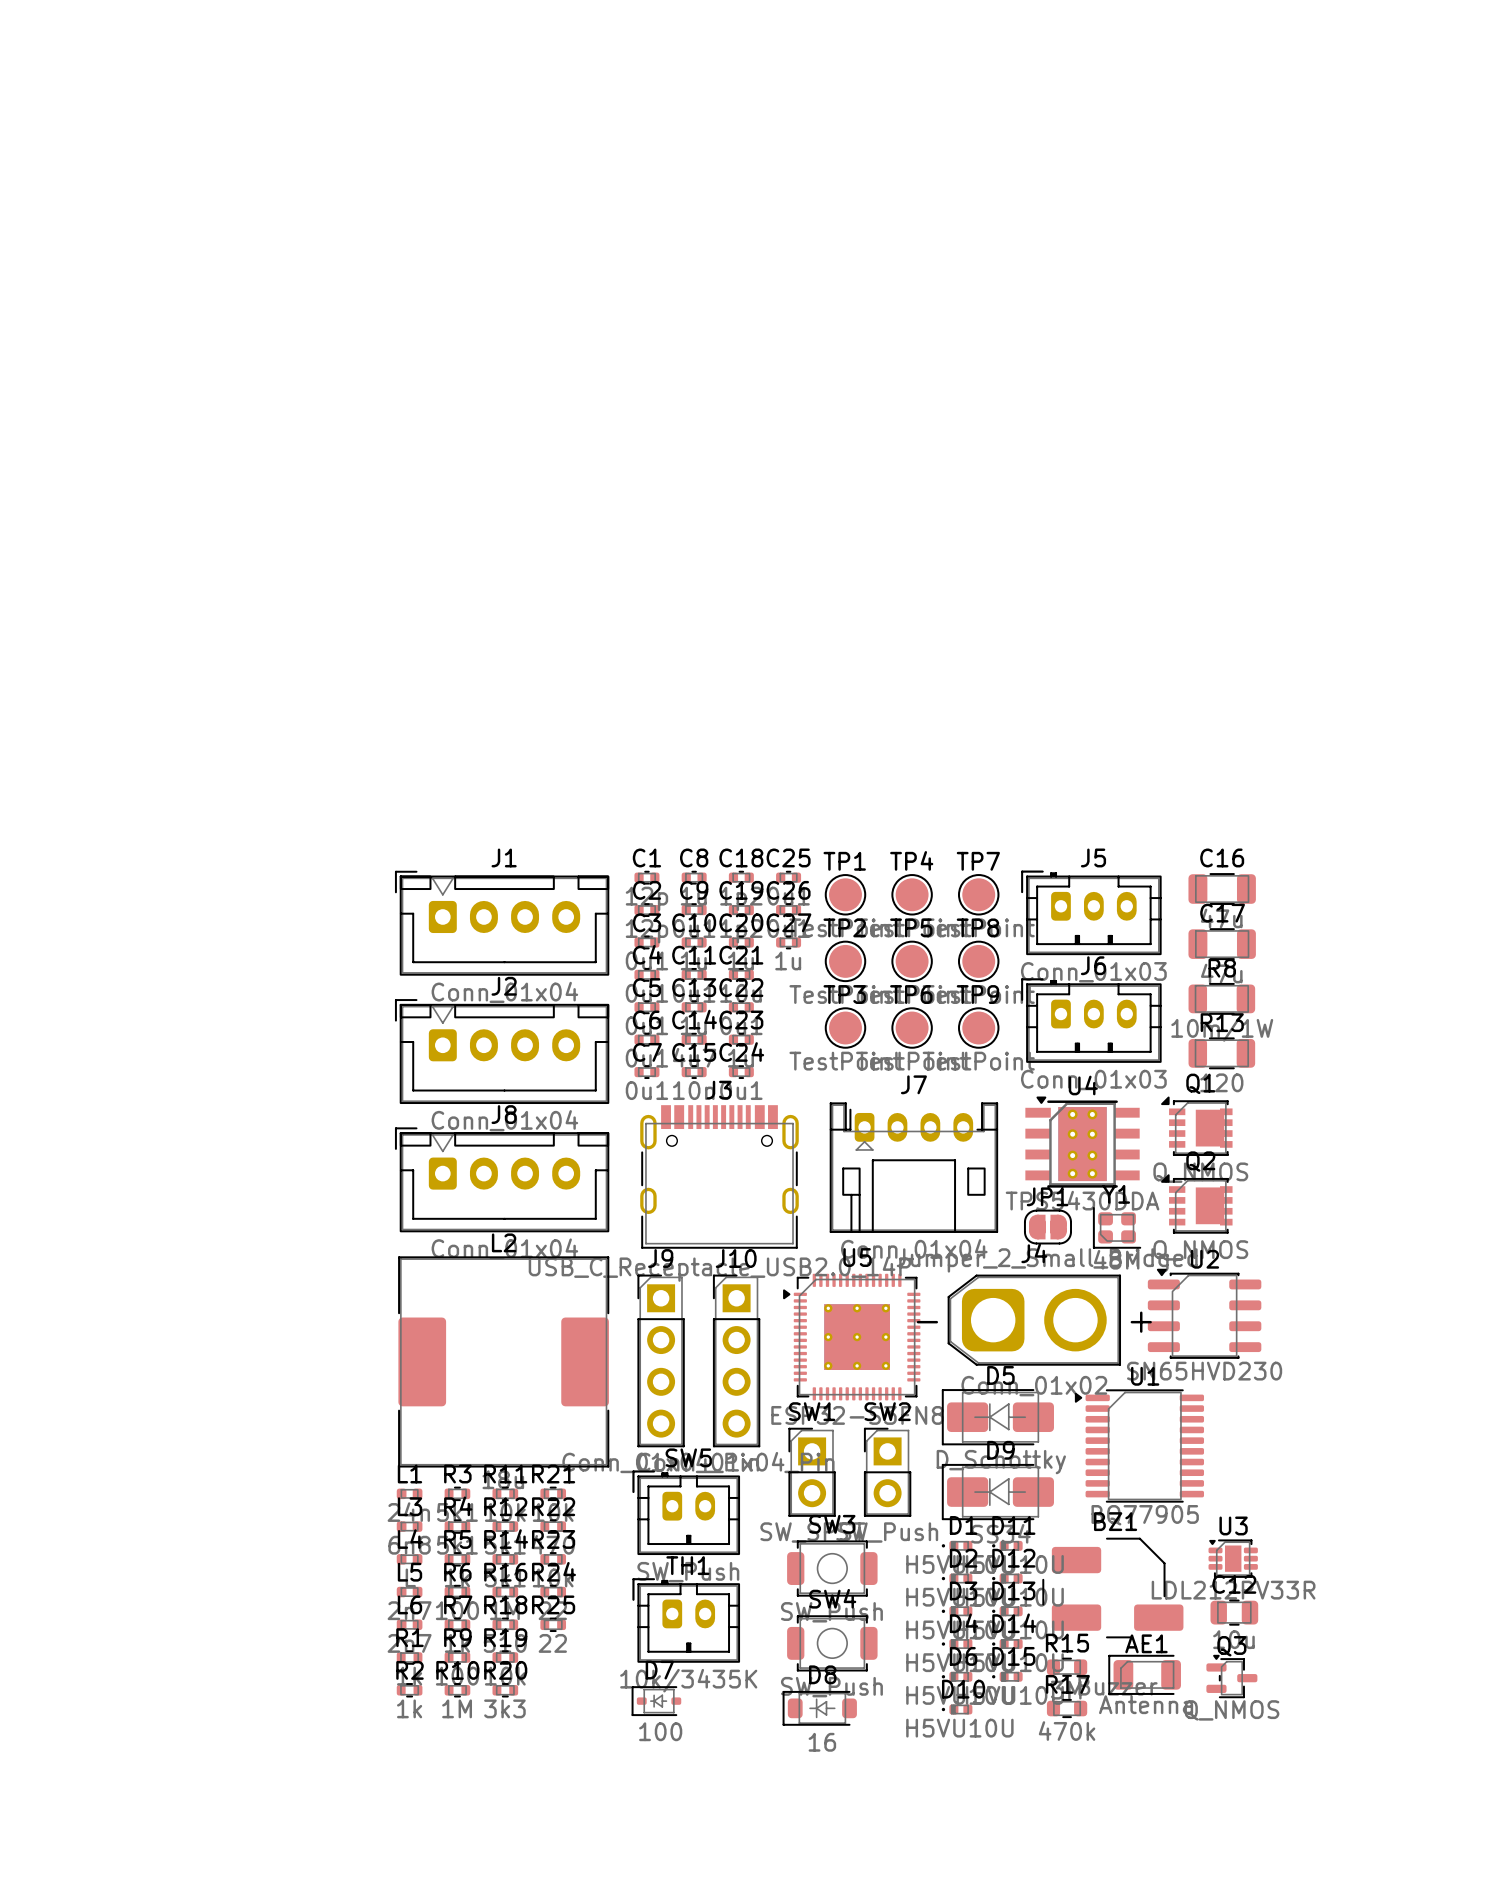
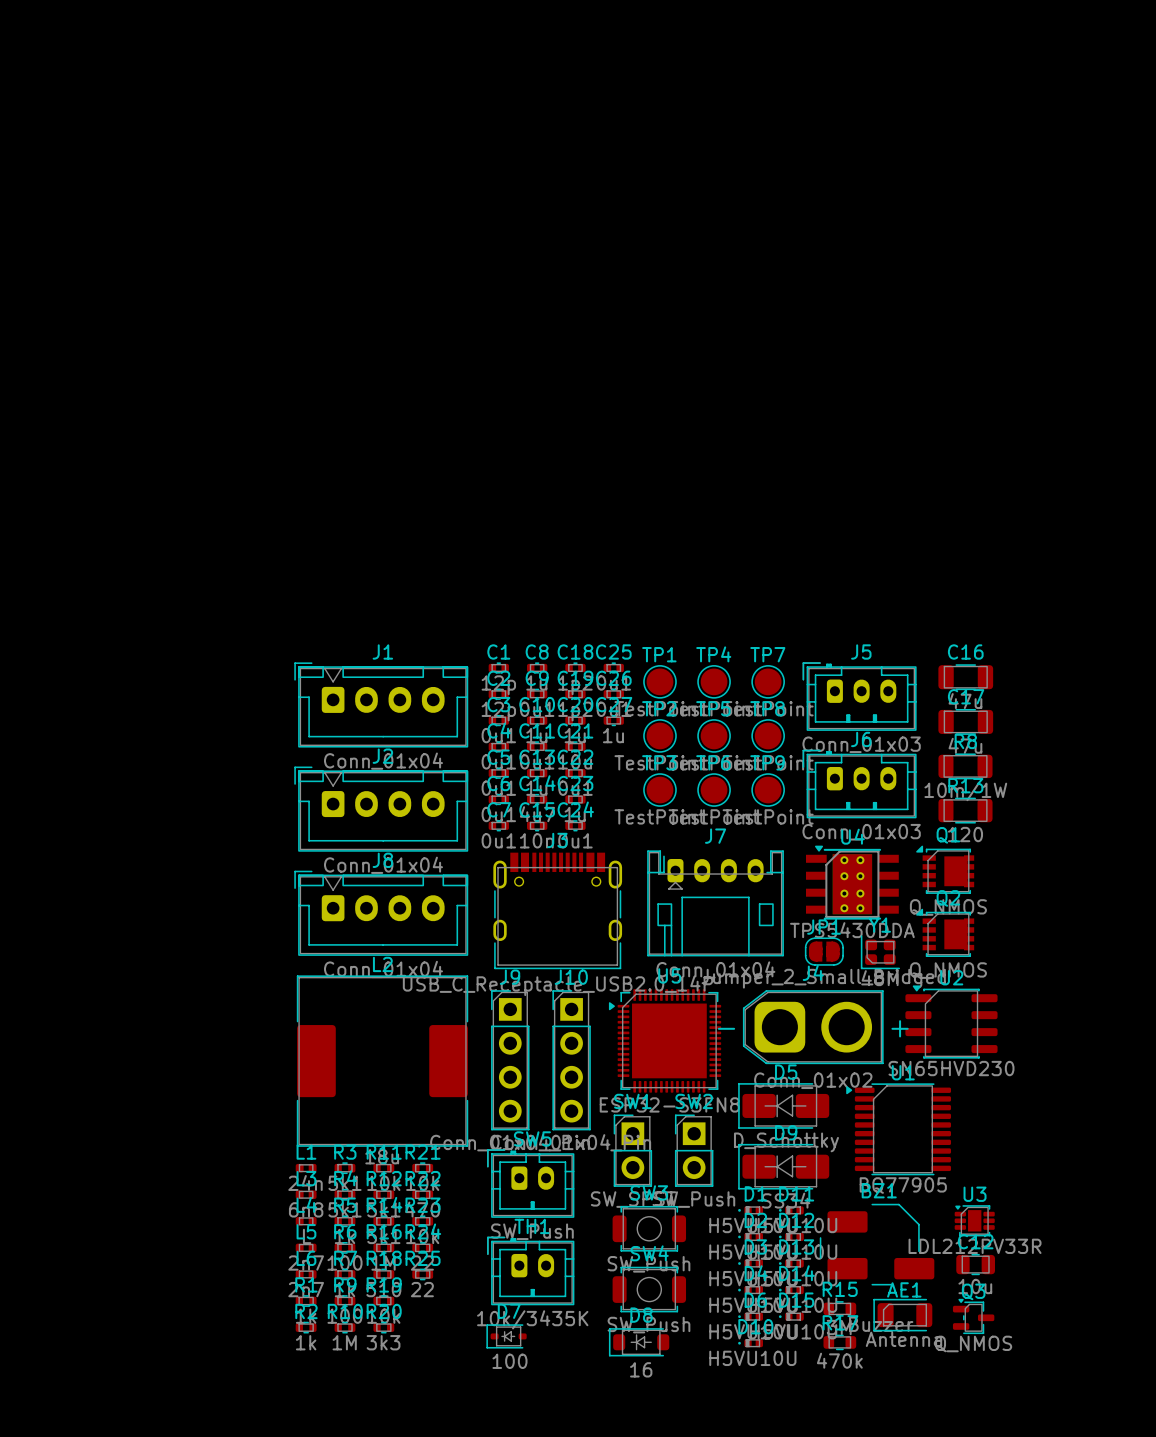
U5 footprint: [783, 1273, 921, 1401] -> [608, 989, 722, 1093]

